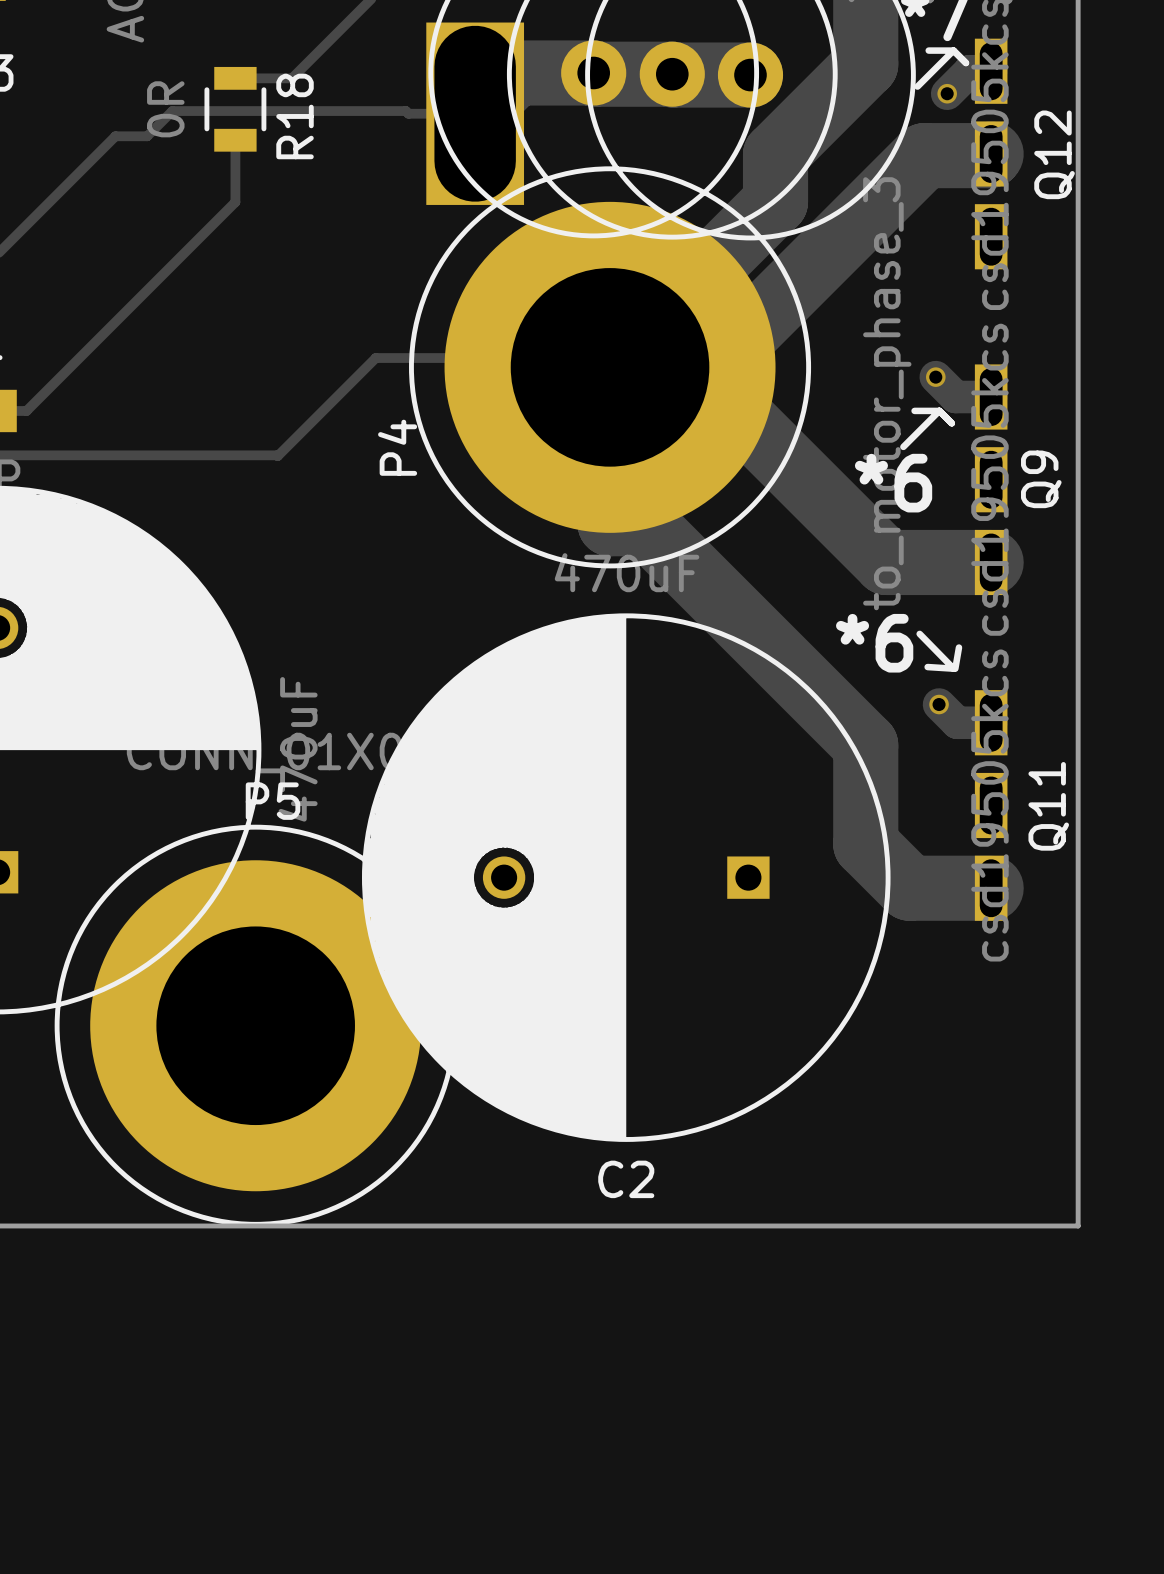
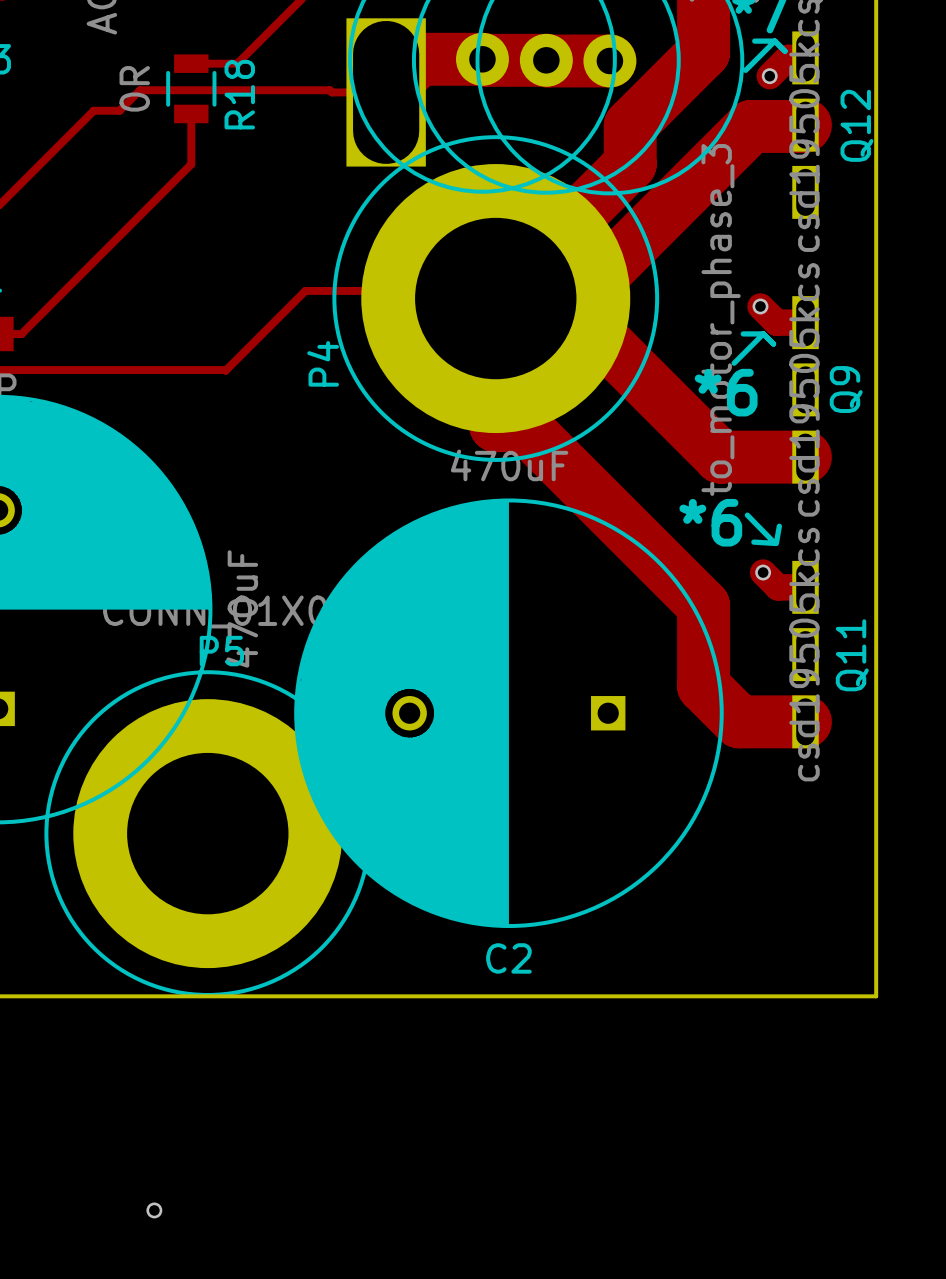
via: none -> (154, 1210)

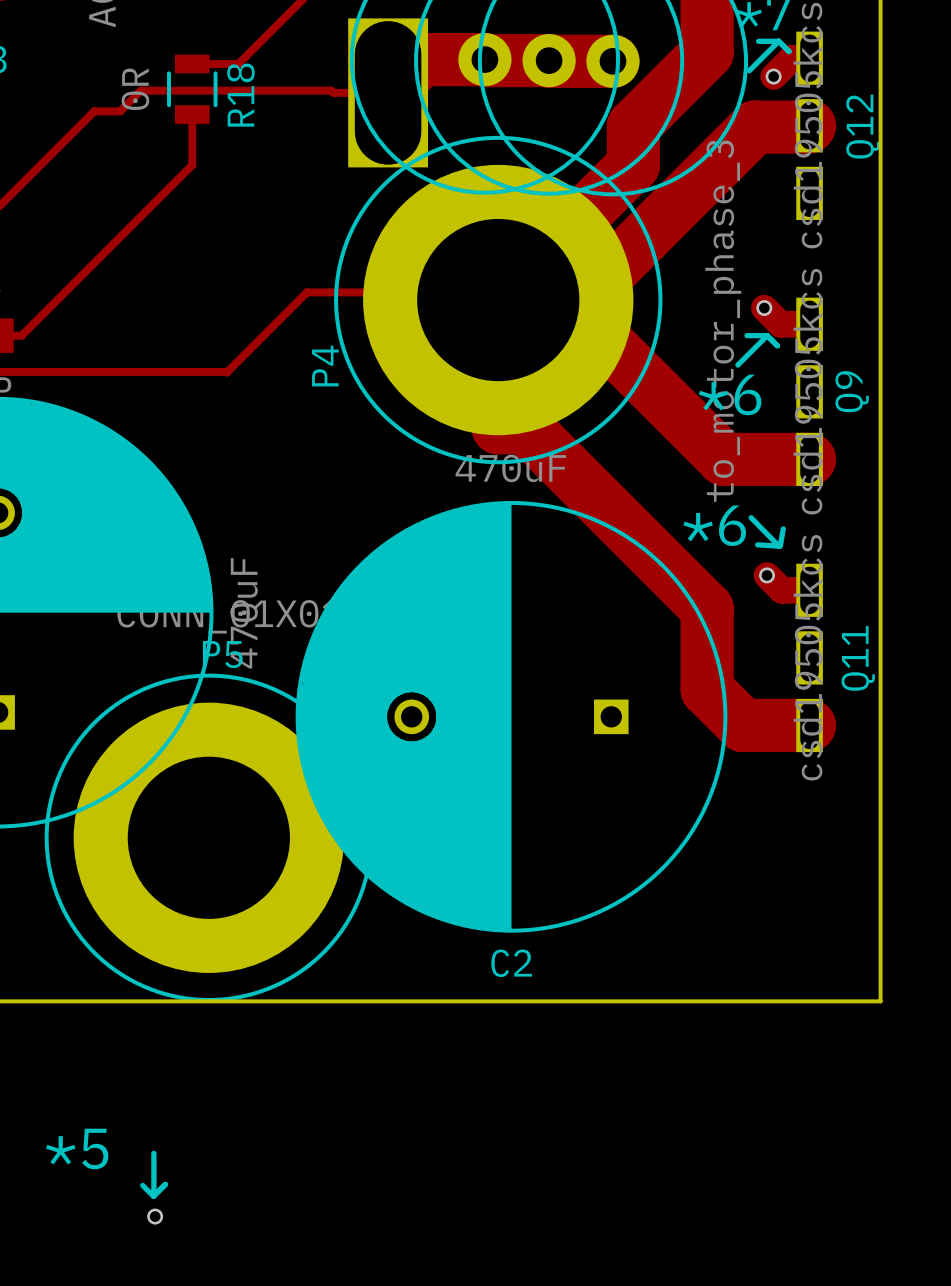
text: none -> *5 (77, 1148)
line: none -> (153, 1153) (153, 1195)
line: none -> (165, 1184) (153, 1196) (142, 1185)

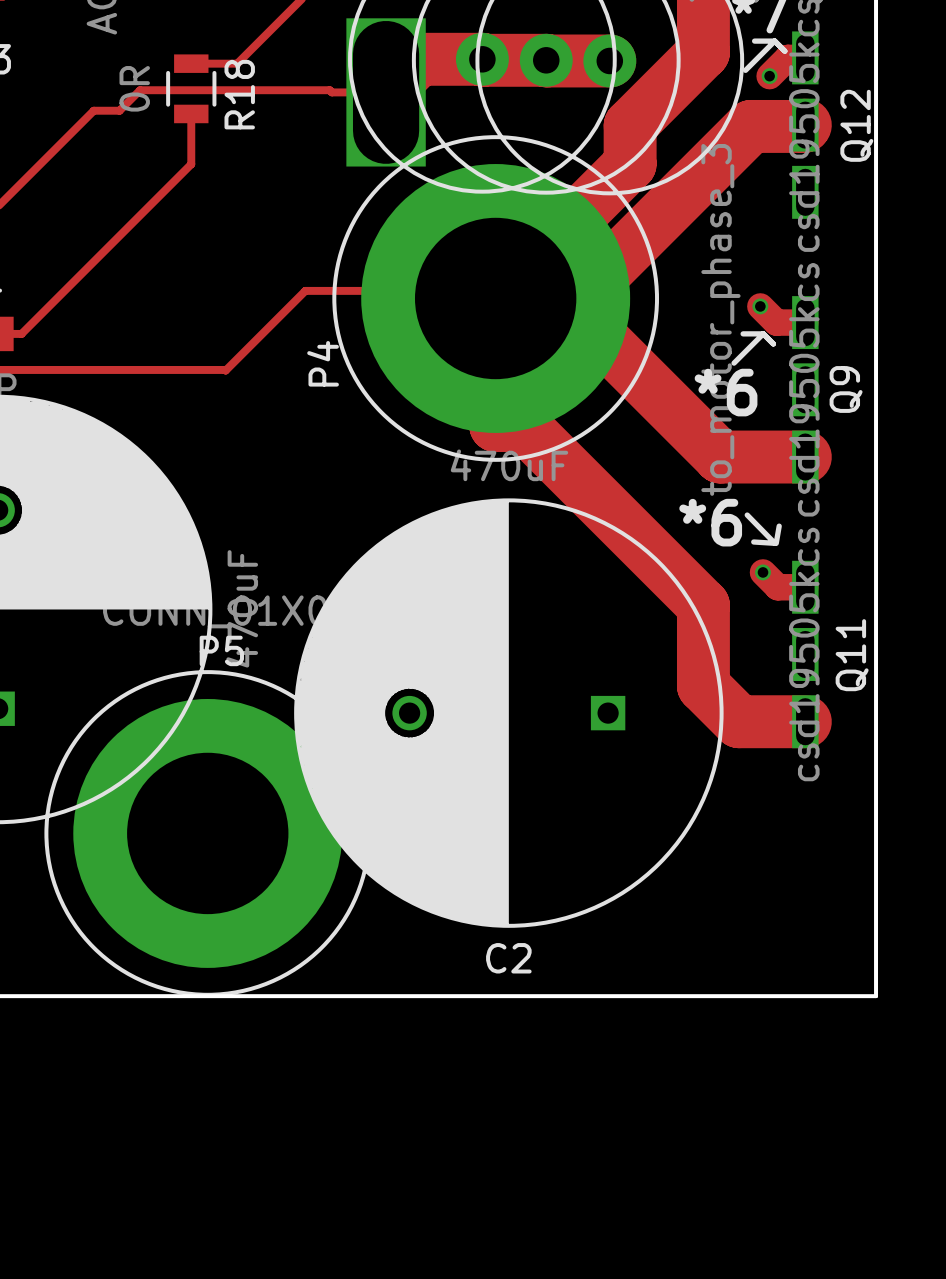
text: *5 (77, 1148) -> none
line: (153, 1153) (153, 1195) -> none
line: (165, 1184) (153, 1196) (142, 1185) -> none
via: (155, 1216) -> none

